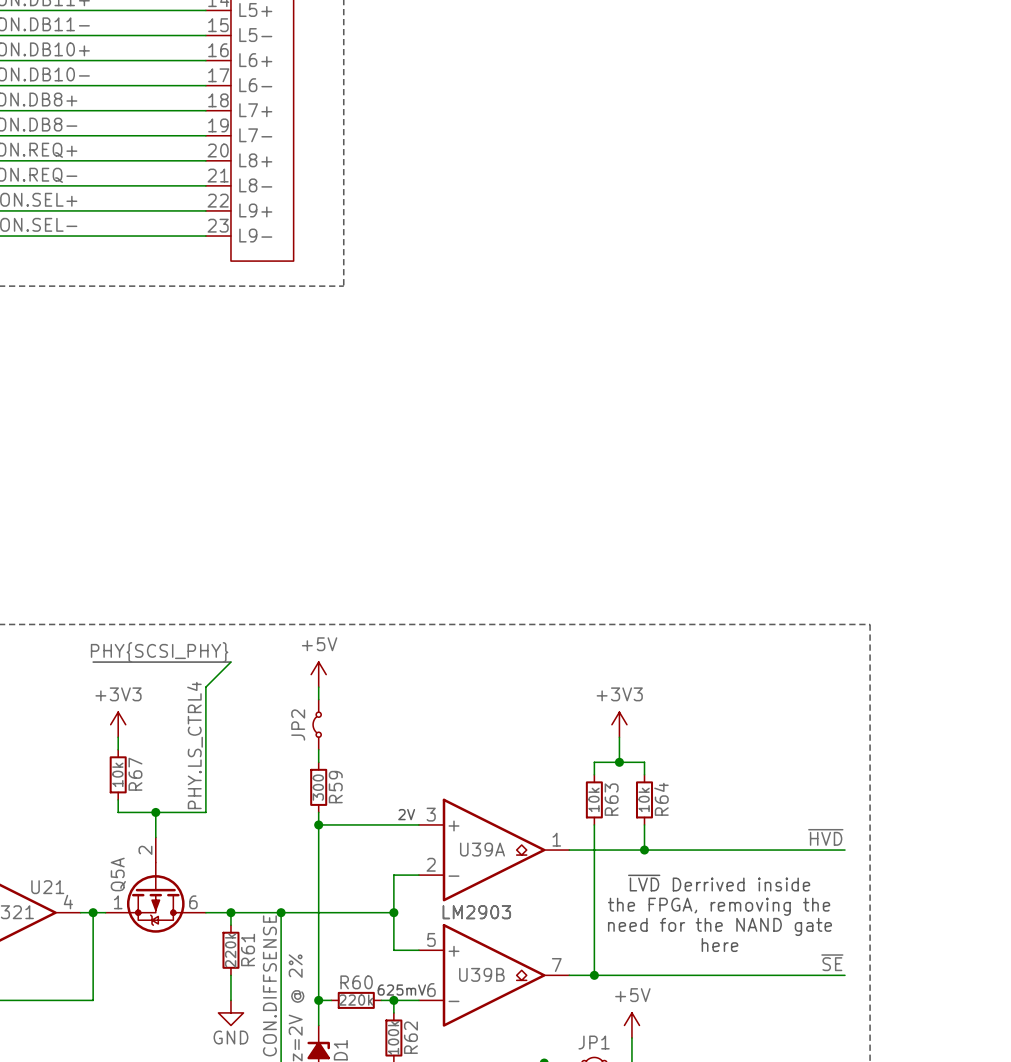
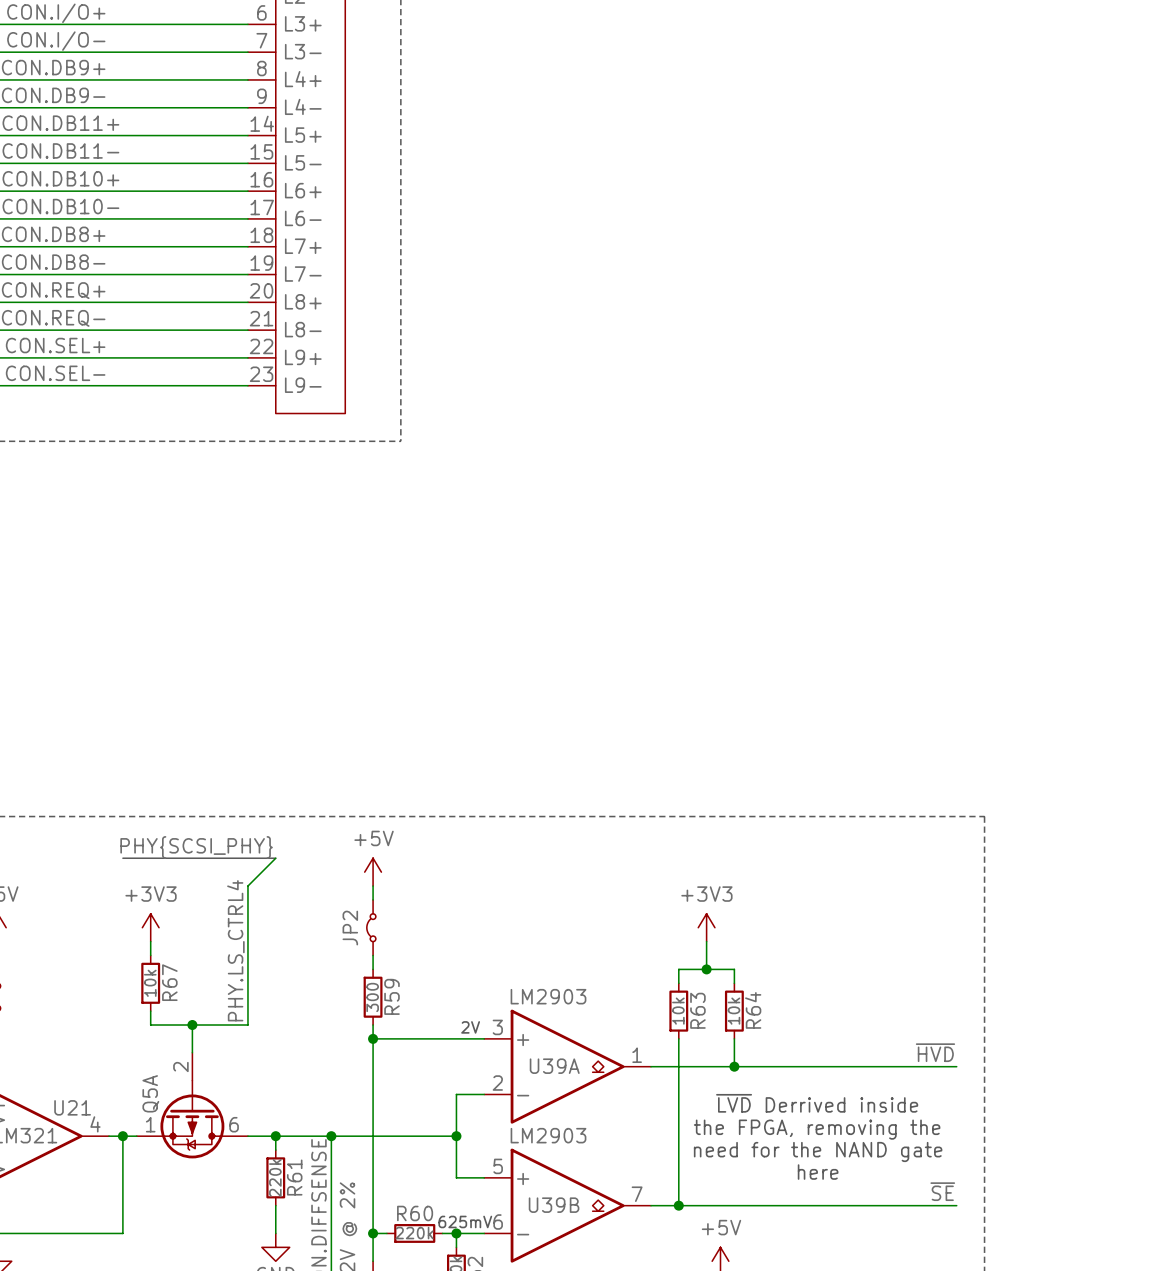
U39A value position: LM2903 (476, 912) -> LM2903 (548, 996)

